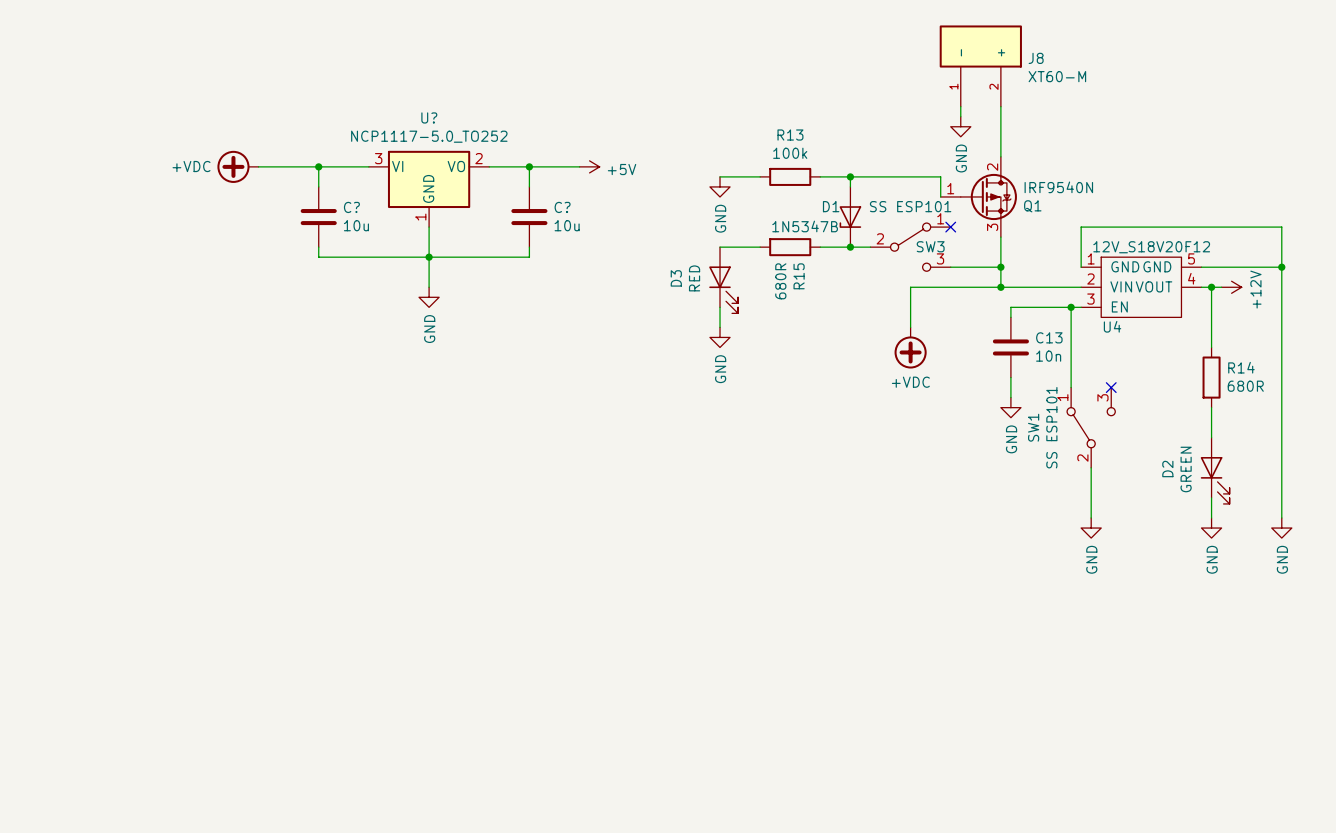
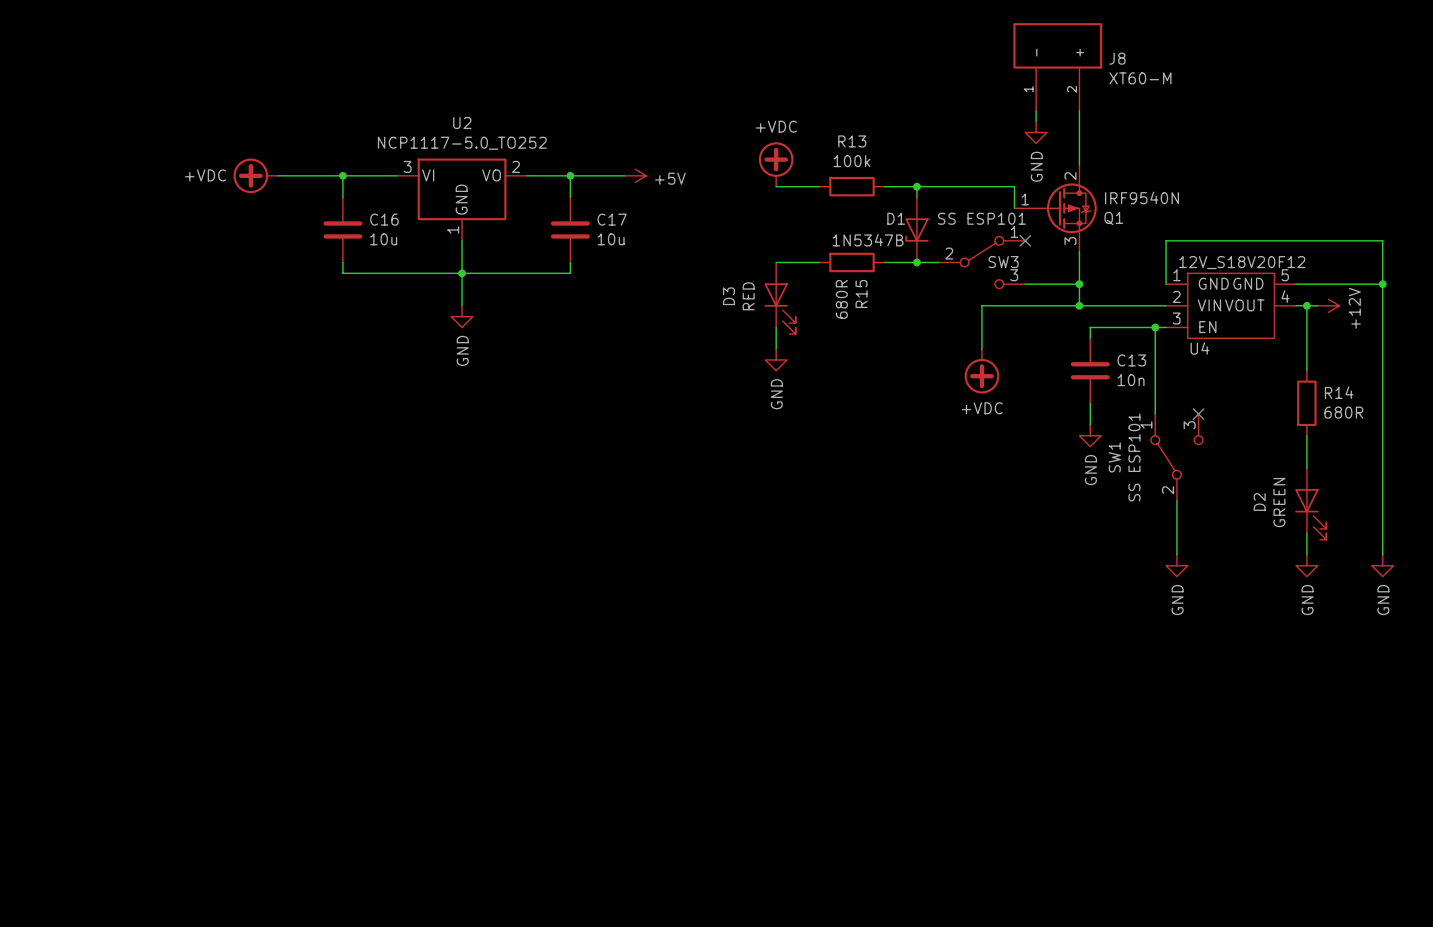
U? name: U? (429, 117) -> U2 (462, 123)
power symbol: none -> +VDC (776, 164)
power symbol: GND (720, 186) -> none
C? name: C? (351, 207) -> C16 (384, 219)
C? name: C? (562, 207) -> C17 (612, 219)

